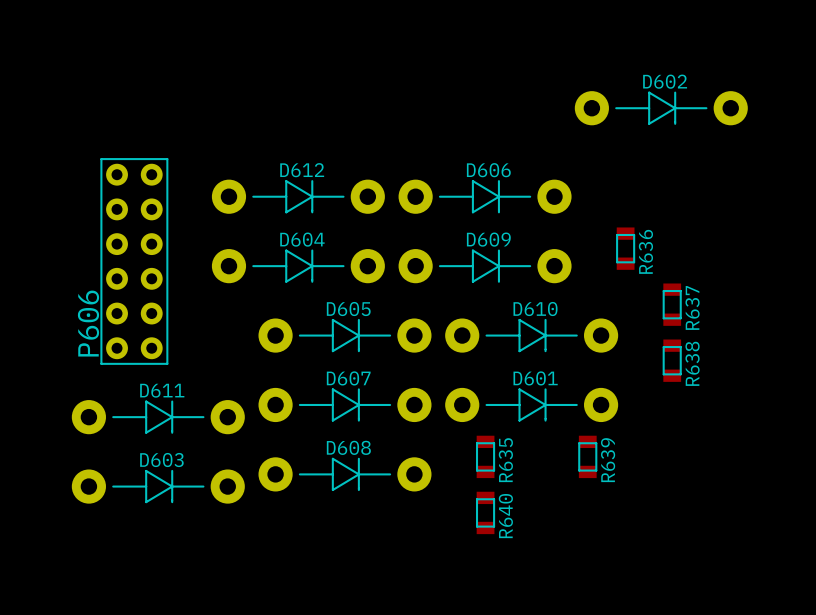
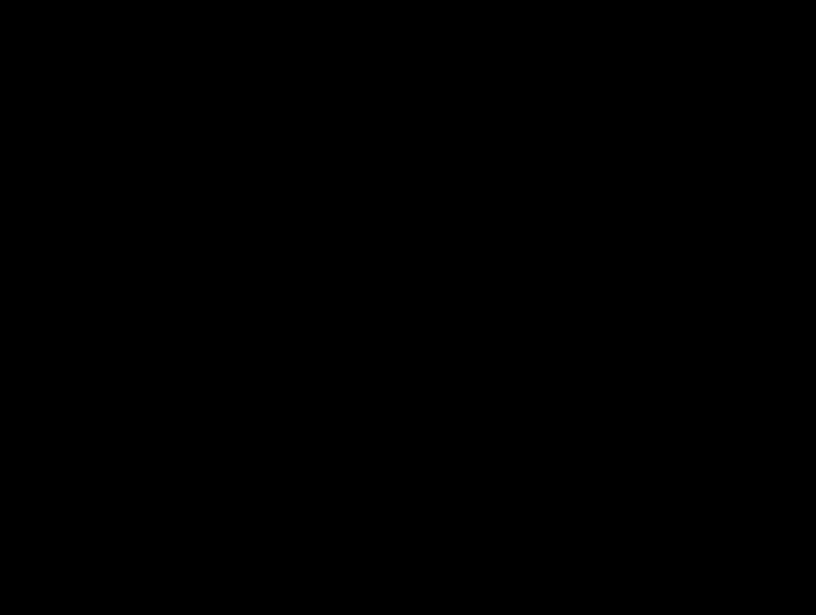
D602: (661, 108) -> none
D612: (298, 196) -> none
D606: (485, 196) -> none
R636: (625, 248) -> none
P606: (134, 261) -> none
D604: (298, 266) -> none
D609: (485, 266) -> none
R637: (672, 304) -> none
D605: (344, 335) -> none
D610: (531, 335) -> none
R638: (672, 360) -> none
D607: (344, 404) -> none
D601: (531, 404) -> none
D611: (158, 417) -> none
R635: (485, 456) -> none
R639: (587, 456) -> none
D608: (344, 474) -> none
D603: (158, 486) -> none
R640: (485, 512) -> none

